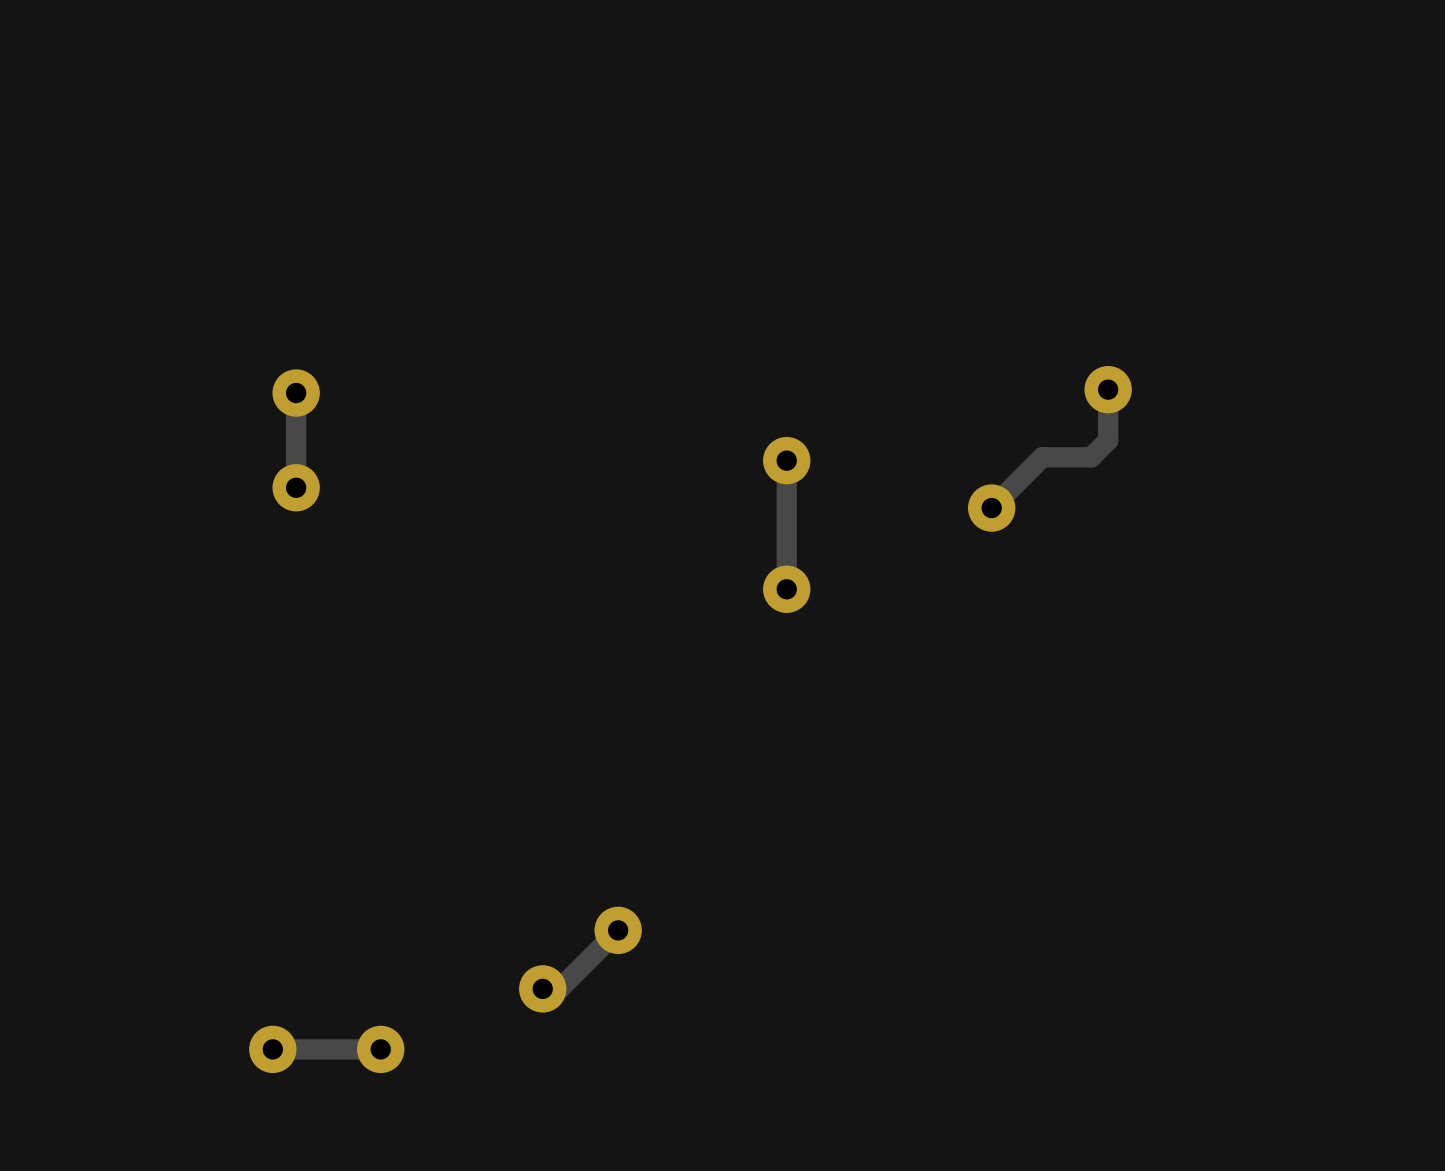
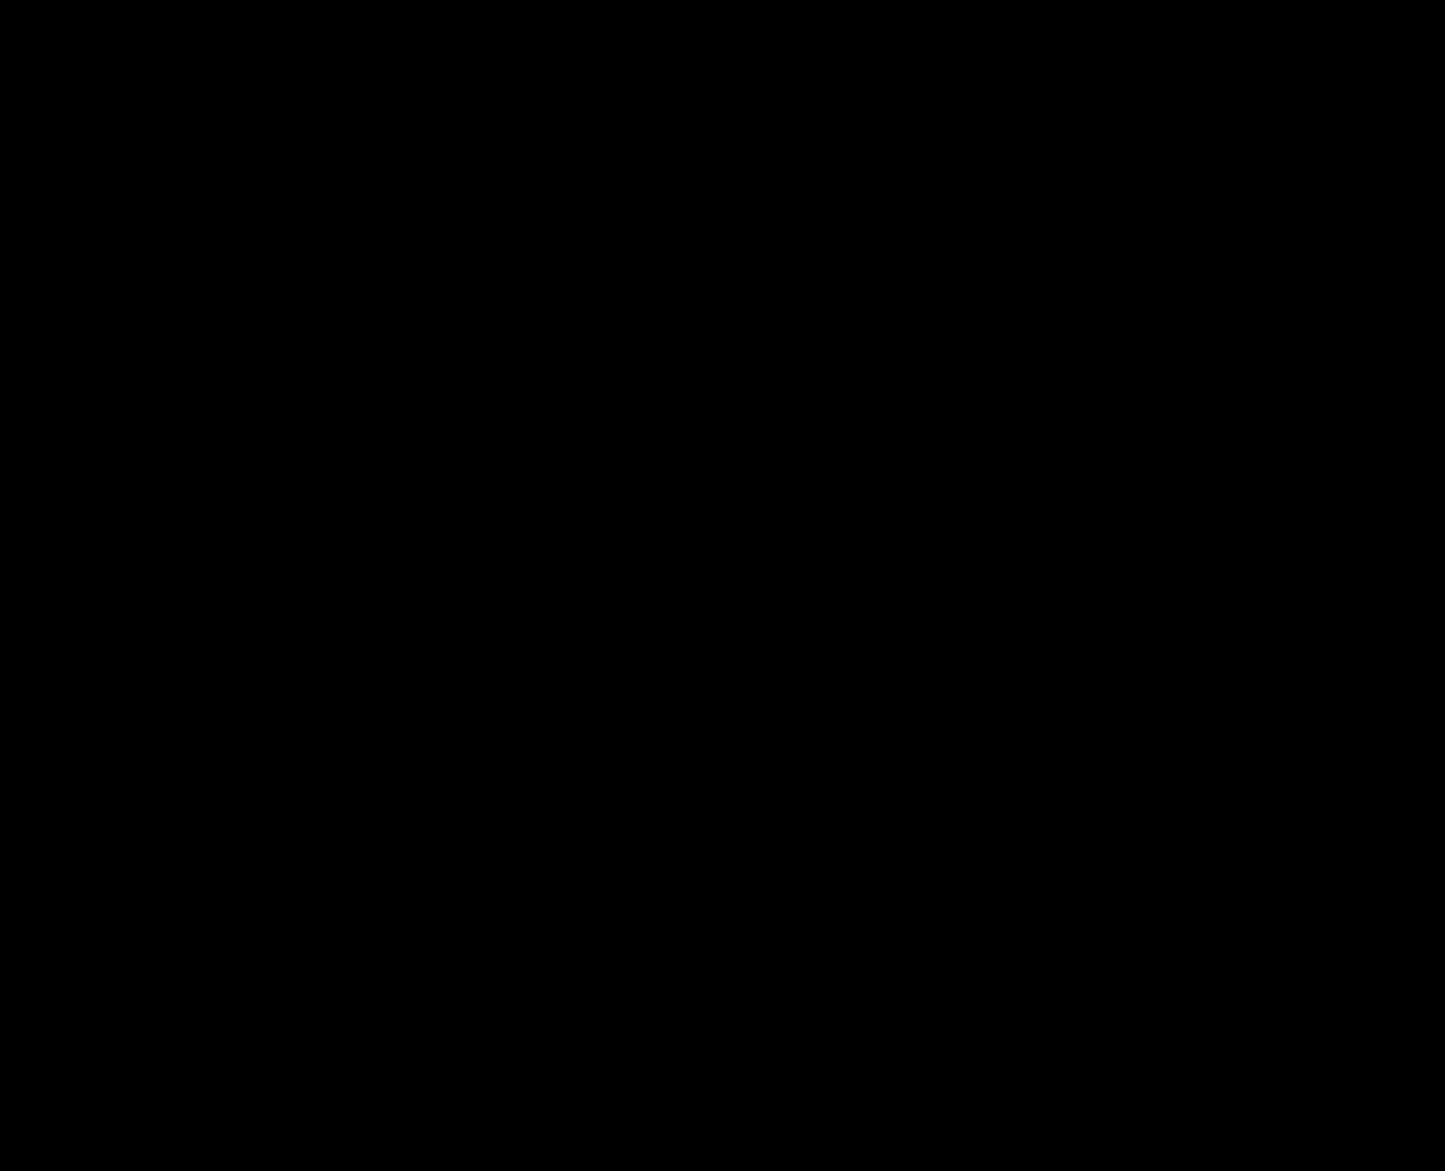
track: (1108, 389) (1108, 440) (1091, 457) (1042, 457) (991, 508) -> none
via: (1108, 389) -> none
track: (296, 393) (296, 487) -> none
via: (296, 393) -> none
track: (786, 460) (786, 589) -> none
via: (786, 460) -> none
via: (296, 487) -> none
via: (991, 508) -> none
via: (786, 589) -> none
track: (618, 930) (559, 988) (542, 988) -> none
via: (618, 930) -> none
via: (542, 988) -> none
via: (272, 1049) -> none
track: (380, 1049) (272, 1049) -> none
via: (380, 1049) -> none

